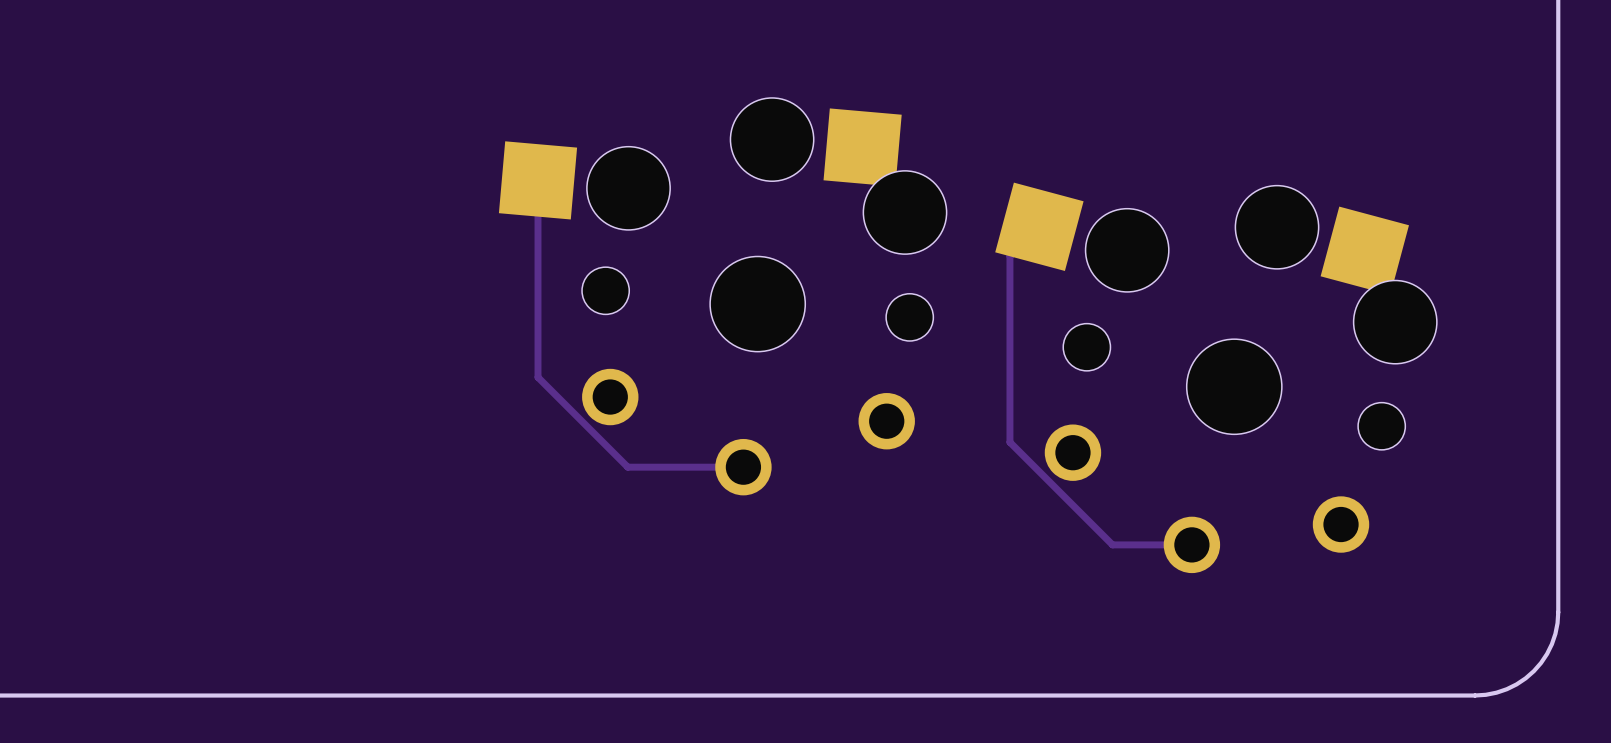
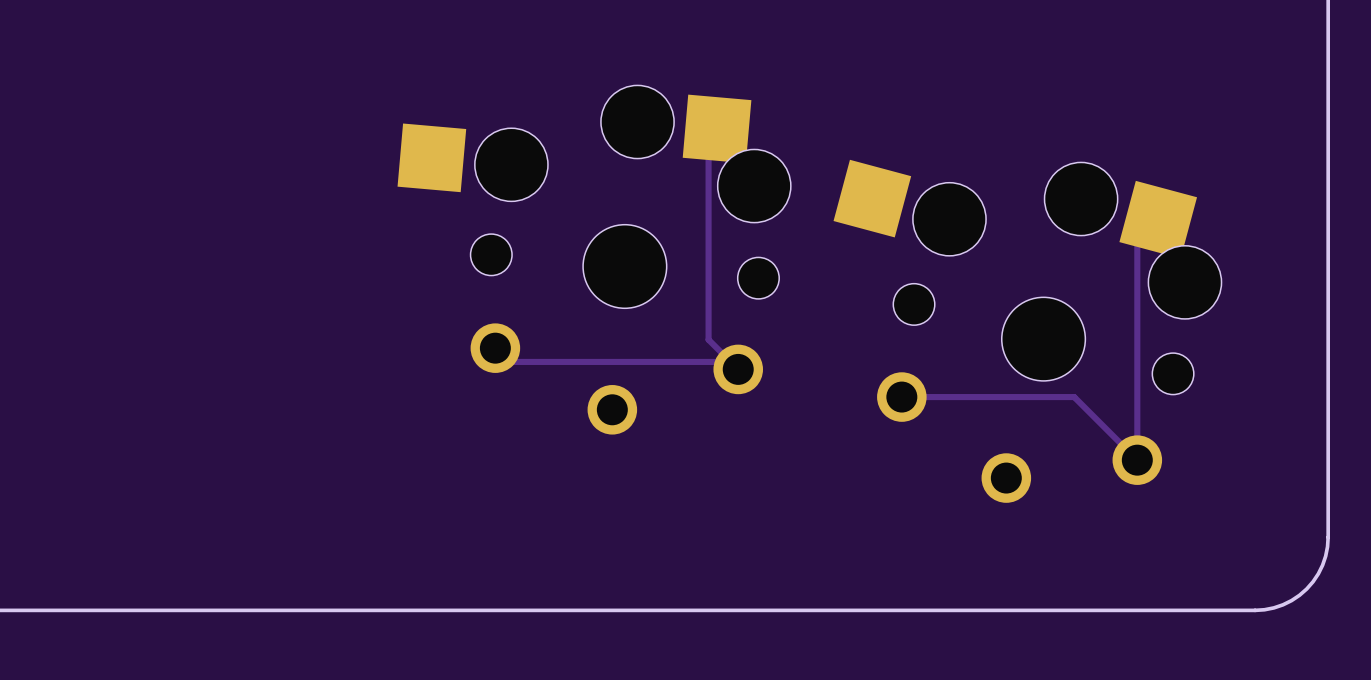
track: none -> (717, 128) (708, 137) (708, 339) (738, 369)
track: (538, 180) (538, 377) (627, 467) (743, 467) -> none
track: (1039, 226) (1009, 256) (1009, 442) (1112, 544) (1191, 544) -> none
track: none -> (1137, 240) (1137, 460) (1074, 397) (901, 397)
track: none -> (495, 348) (509, 361) (730, 361)

